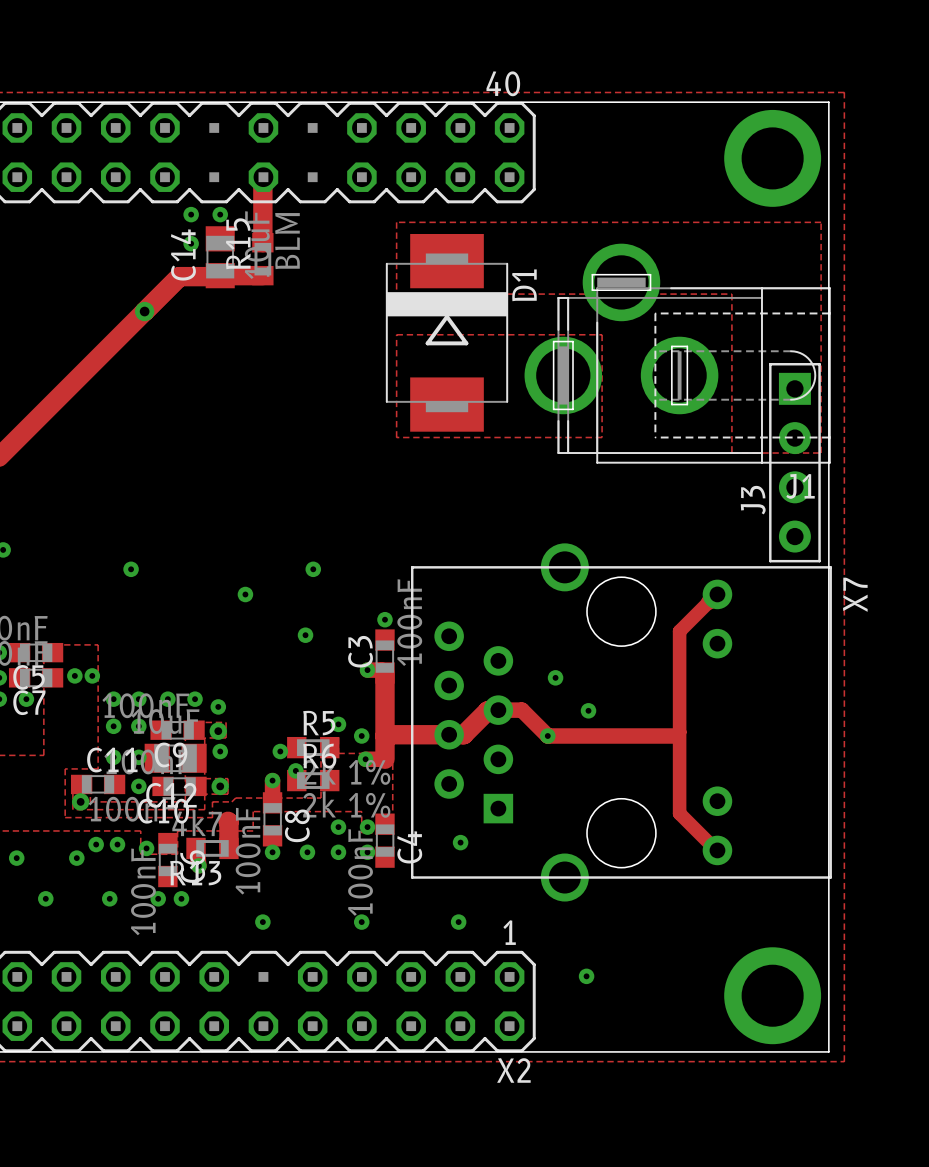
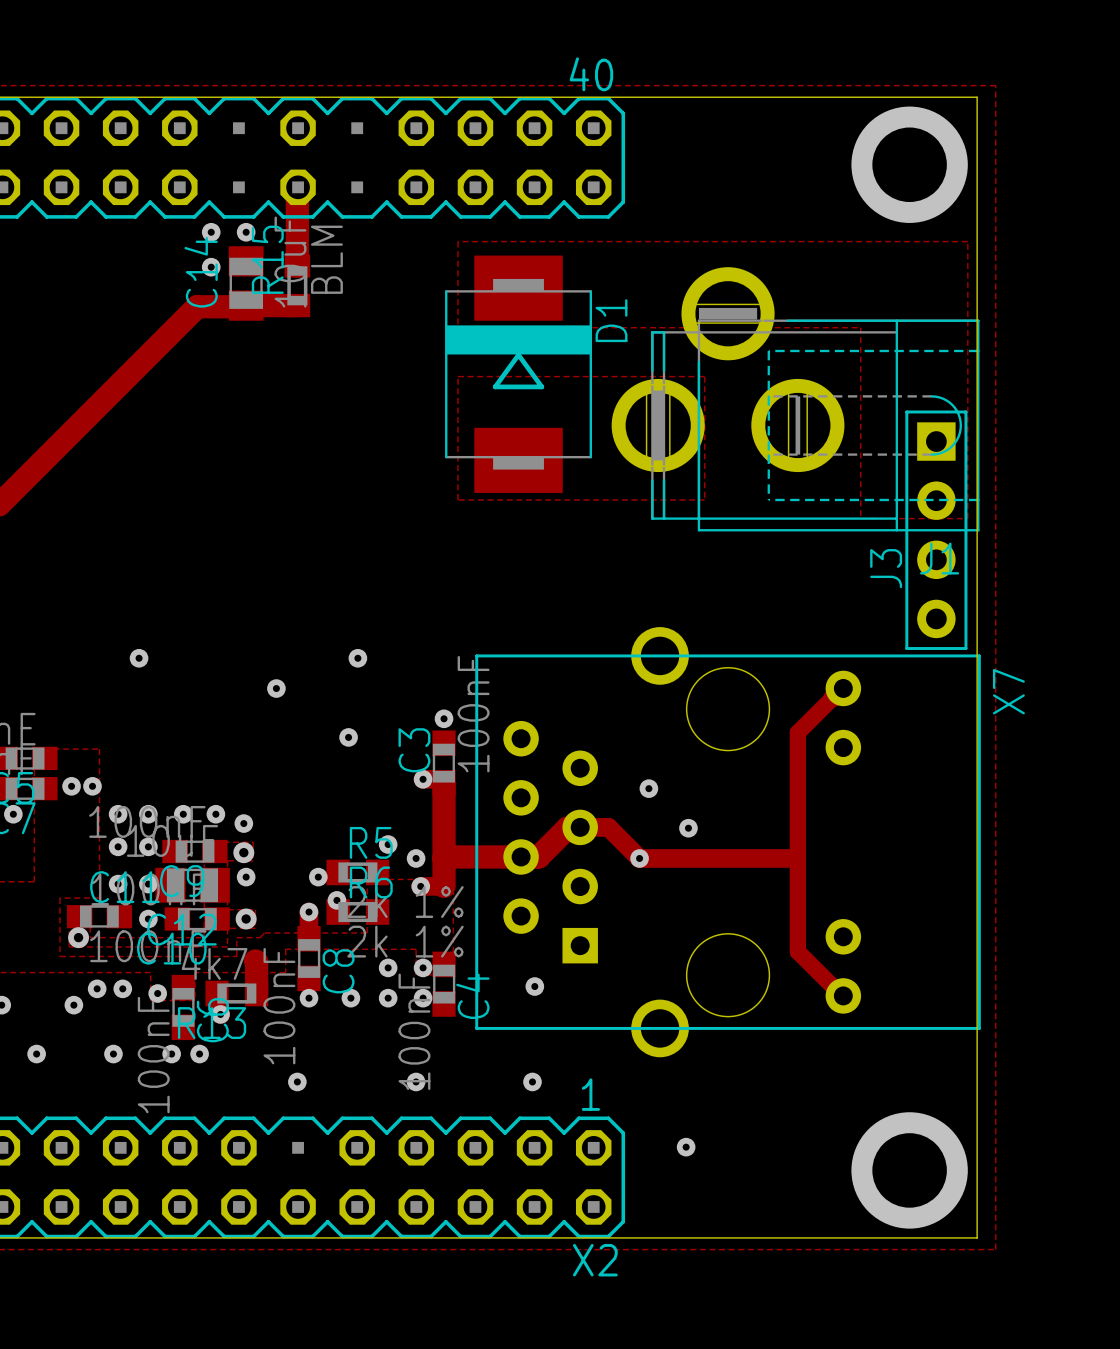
via: (144, 311) -> none

